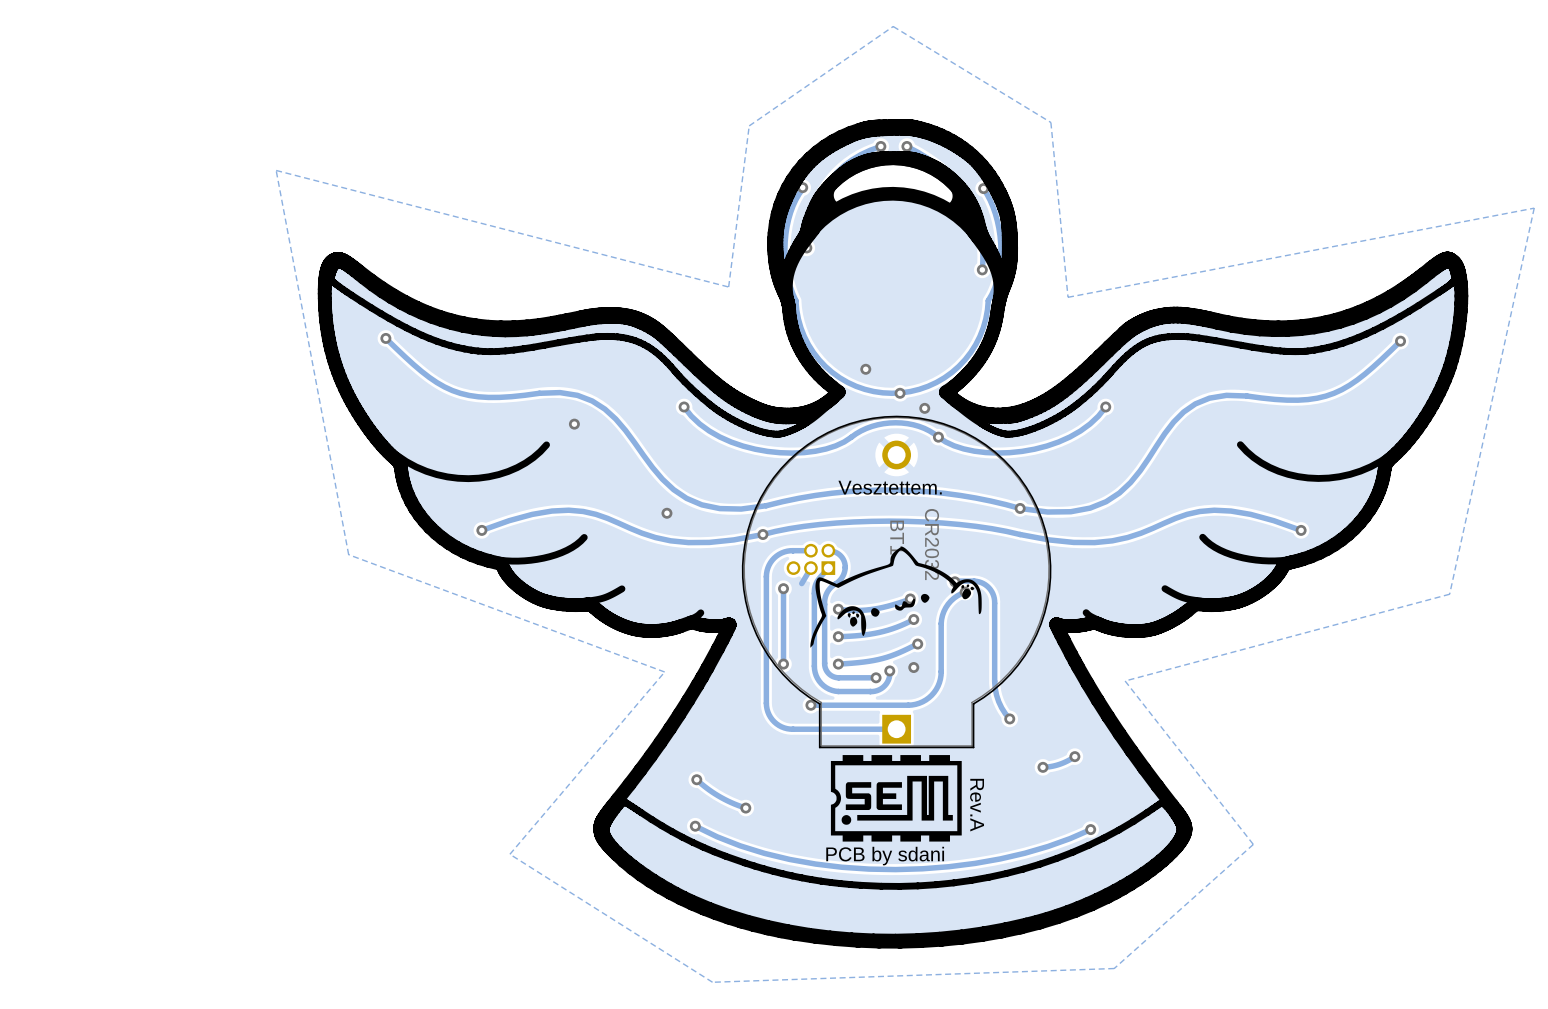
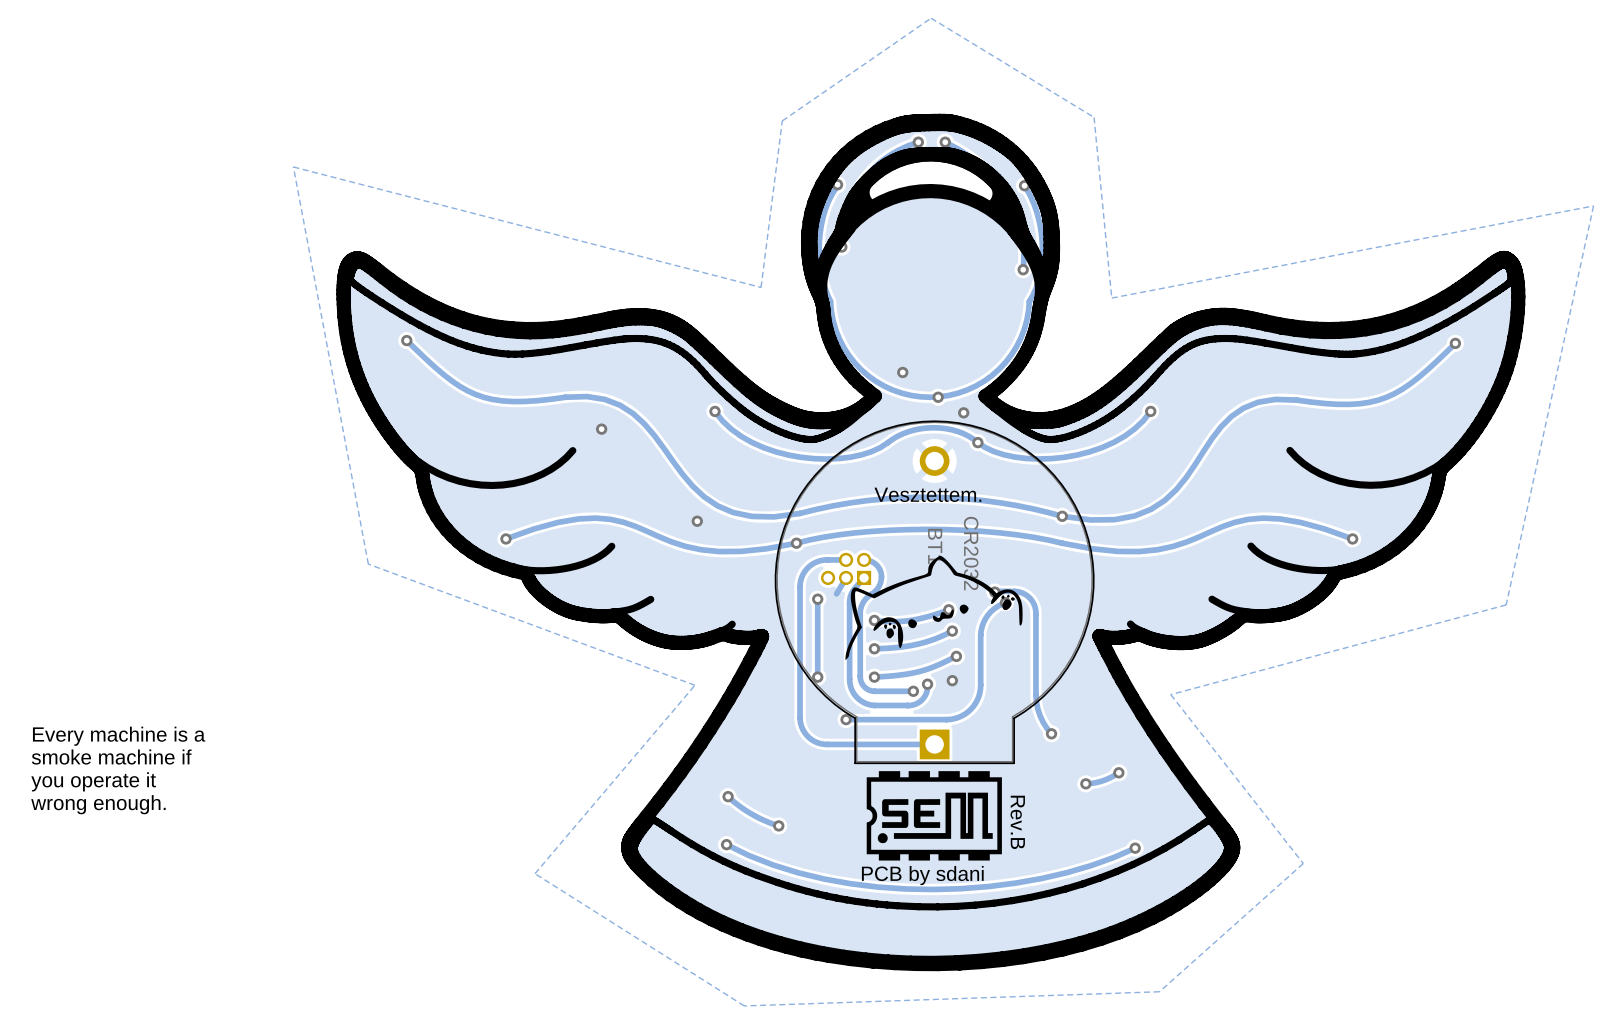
text: none -> Every machine is a (119, 736)
text: none -> smoke machine if (111, 757)
text: none -> you operate it (93, 781)
text: none -> wrong enough. (98, 804)
text: Rev.A (977, 805) -> Rev.B (1017, 822)

